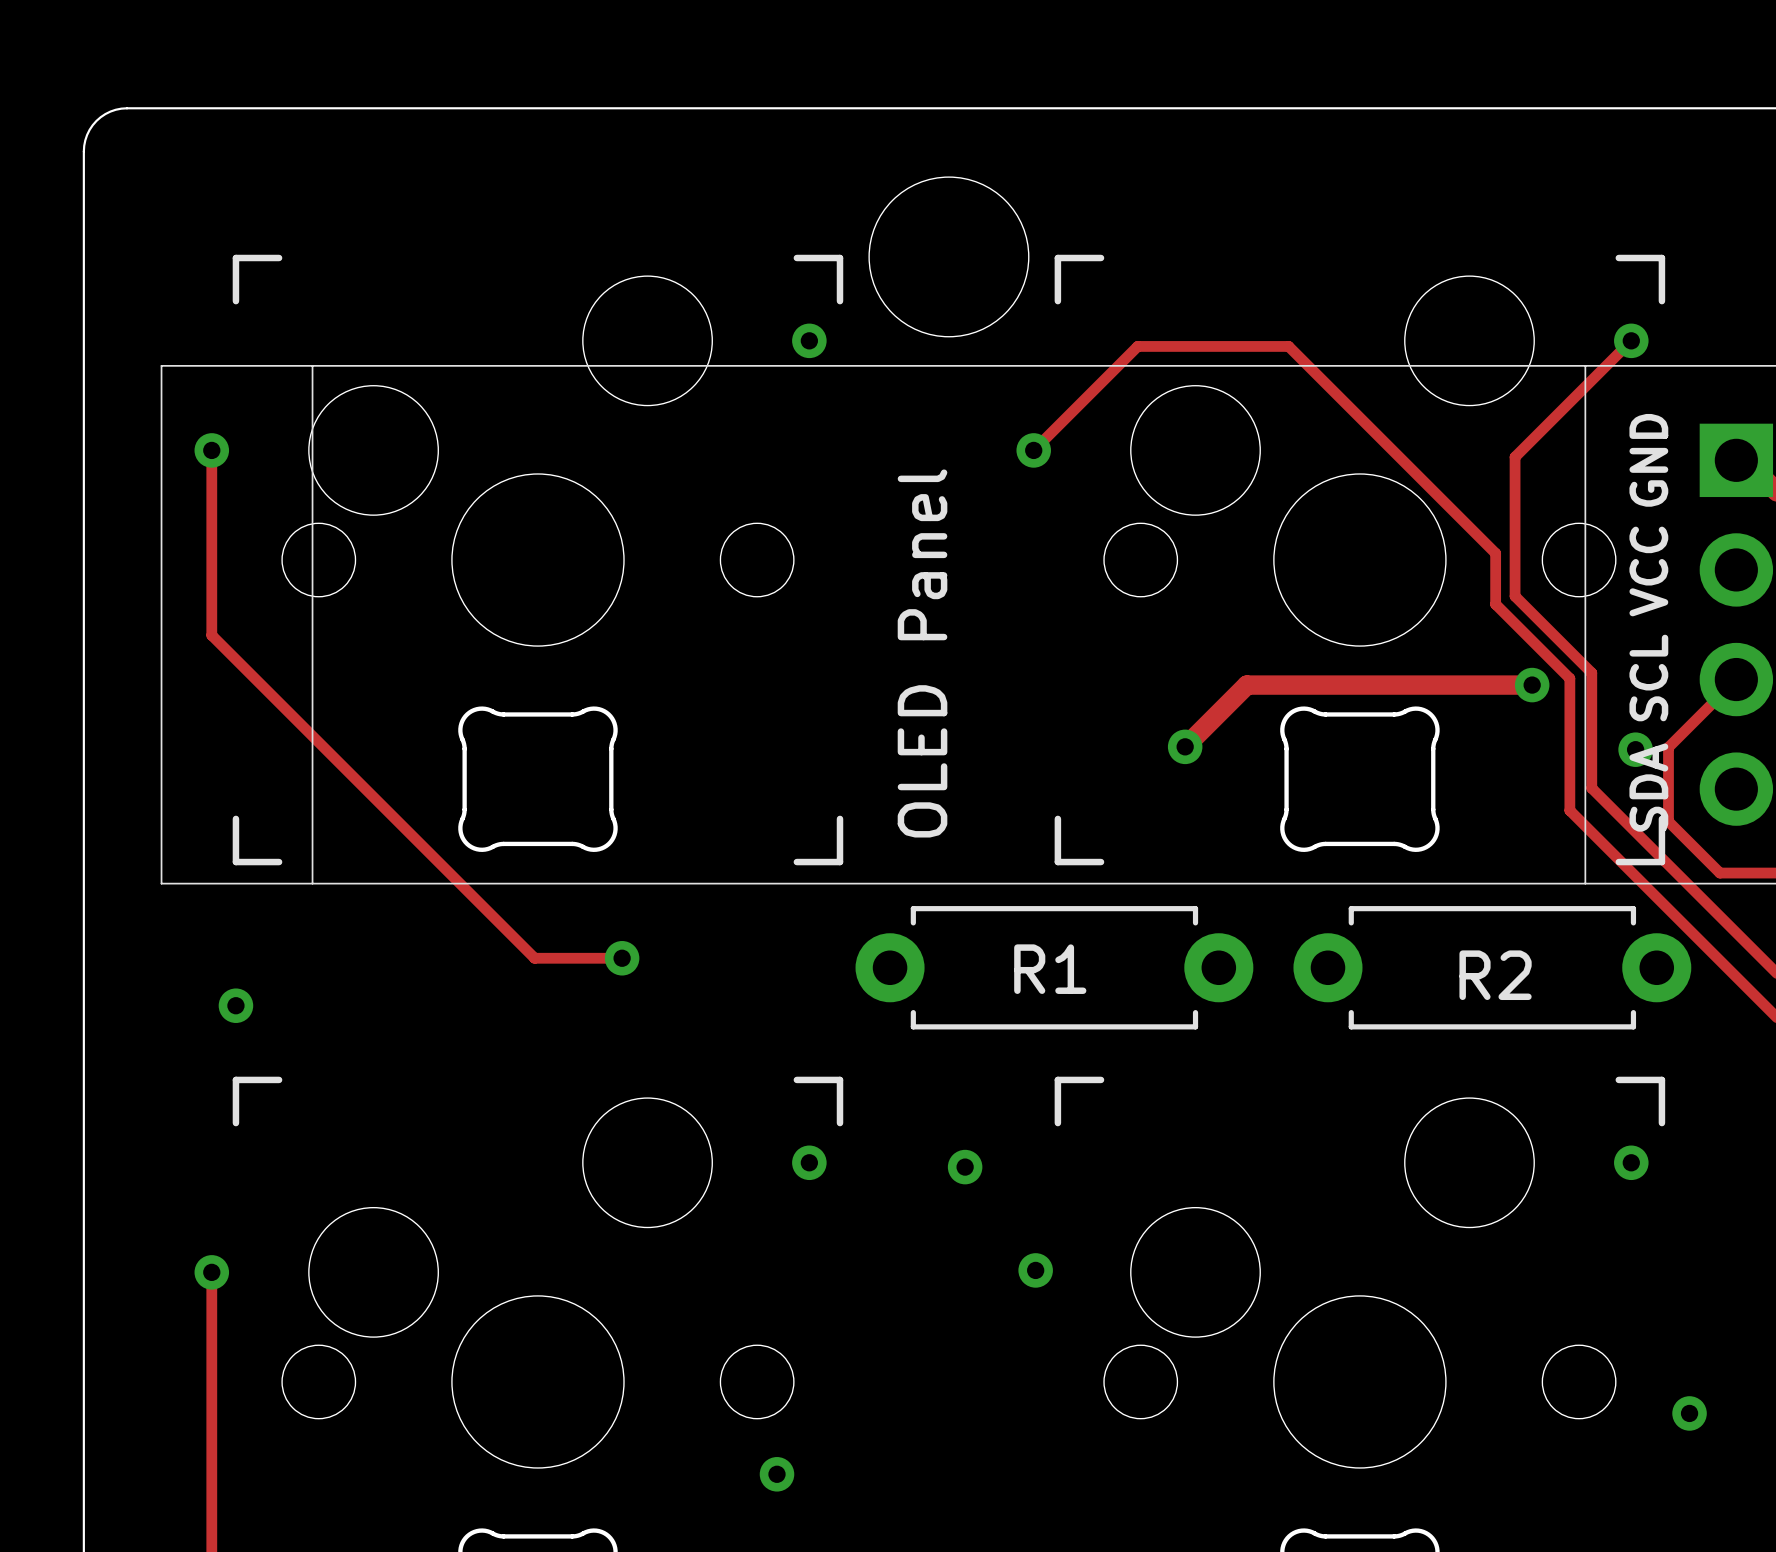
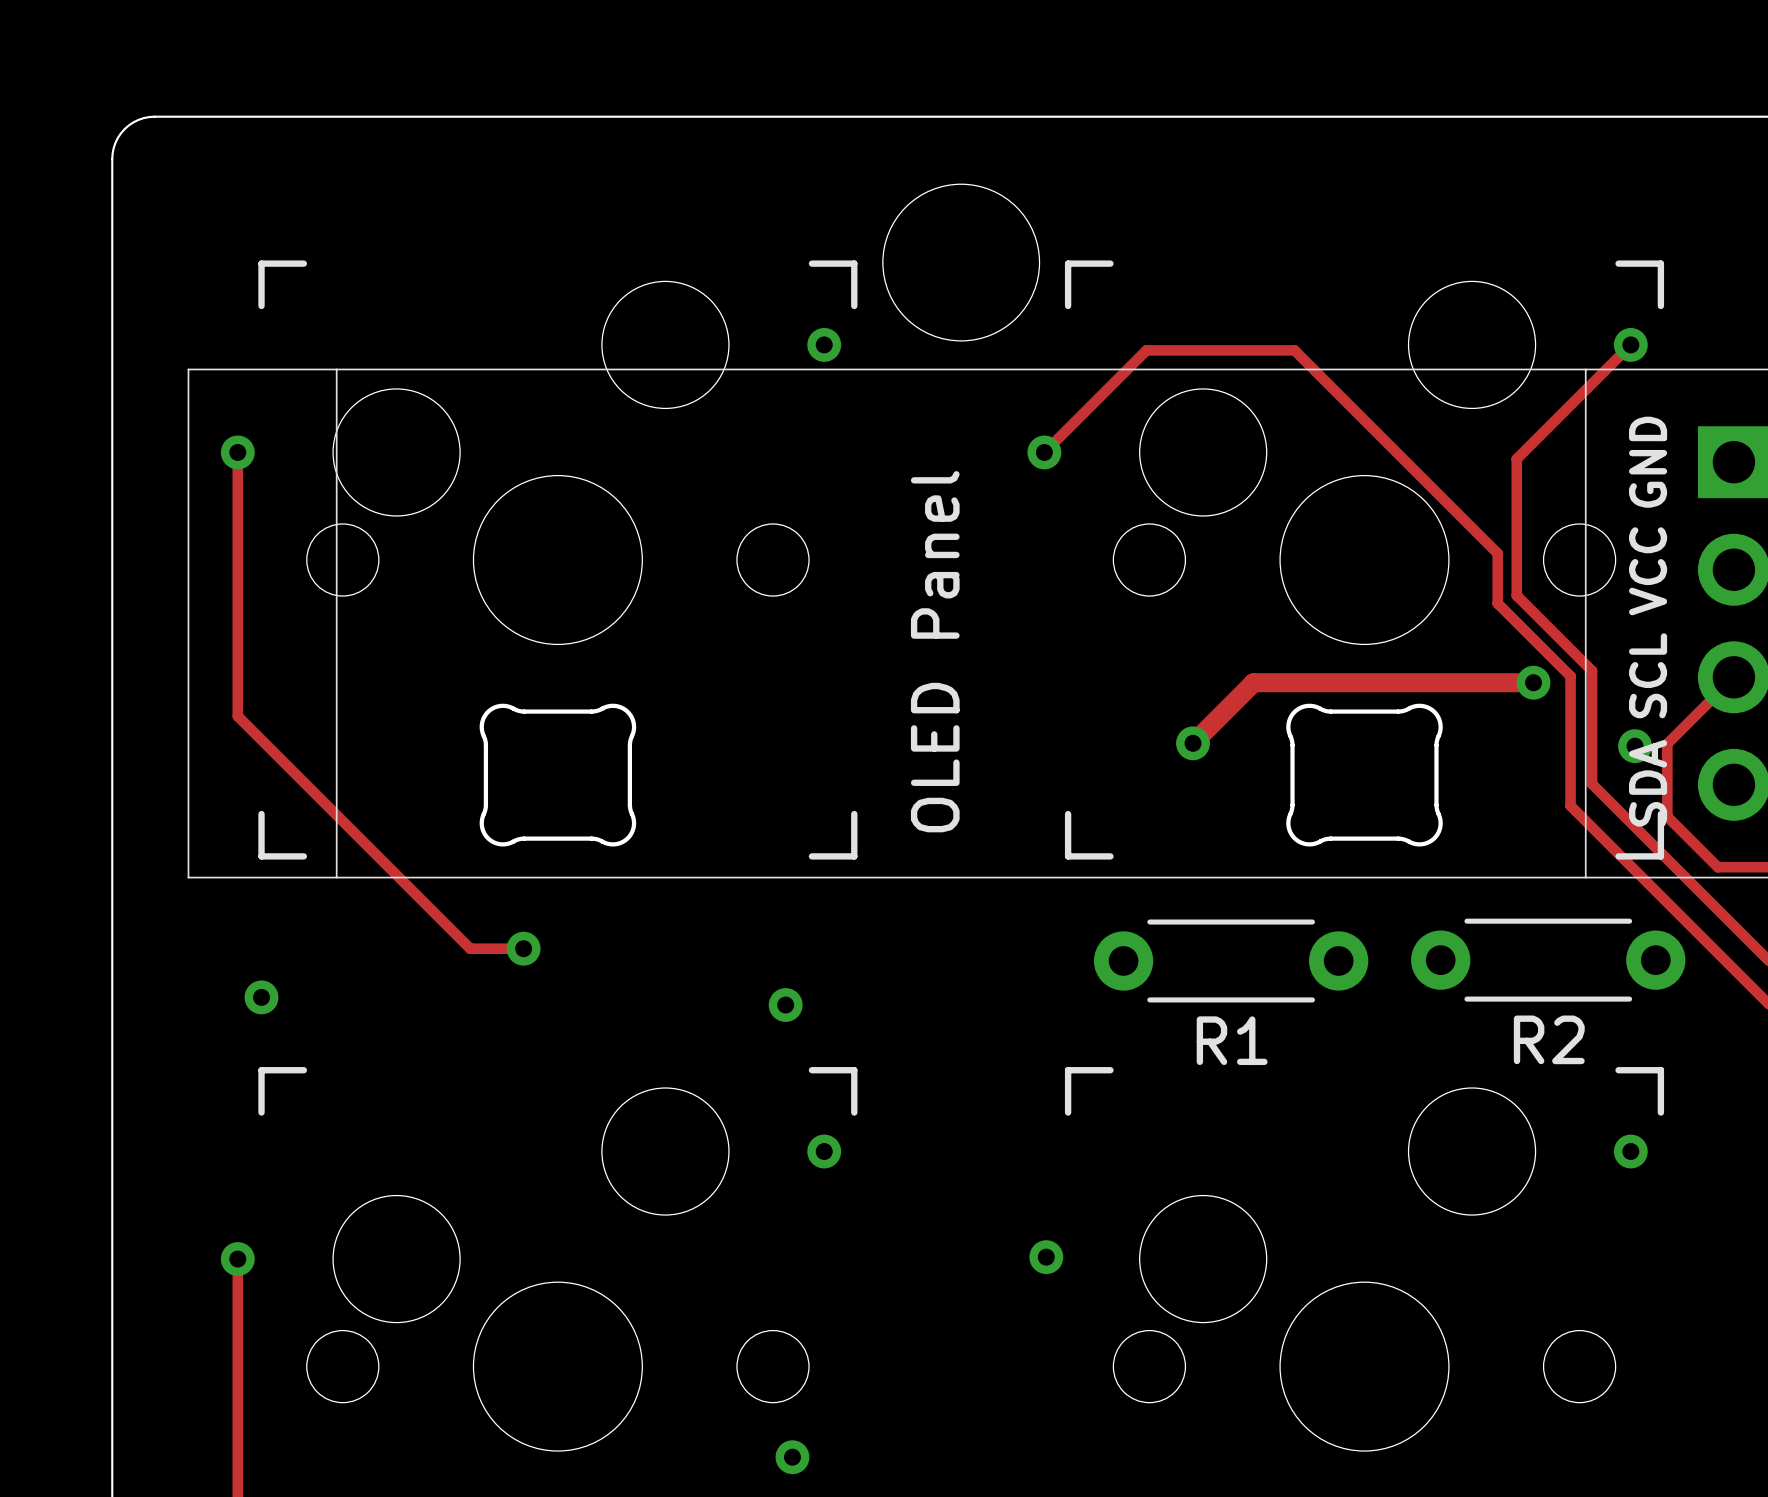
track: (211, 635) (534, 958) (622, 958) -> (237, 633) (237, 716) (470, 948) (523, 948)
R1 footprint: [855, 906, 1254, 1030] -> [1093, 919, 1369, 1003]
R2 footprint: [1293, 906, 1692, 1030] -> [1411, 918, 1686, 1002]
via: none -> (523, 948)
via: (622, 958) -> none
via: none -> (785, 1005)
via: (965, 1167) -> none
via: (1689, 1413) -> none

